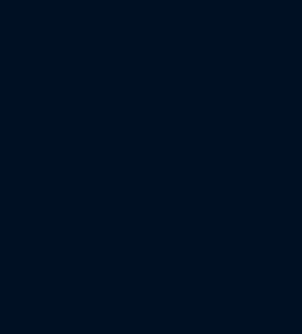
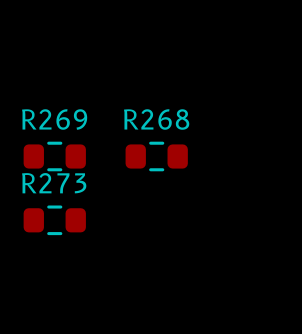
R269: none -> (54, 156)
R268: none -> (156, 156)
R273: none -> (54, 220)

